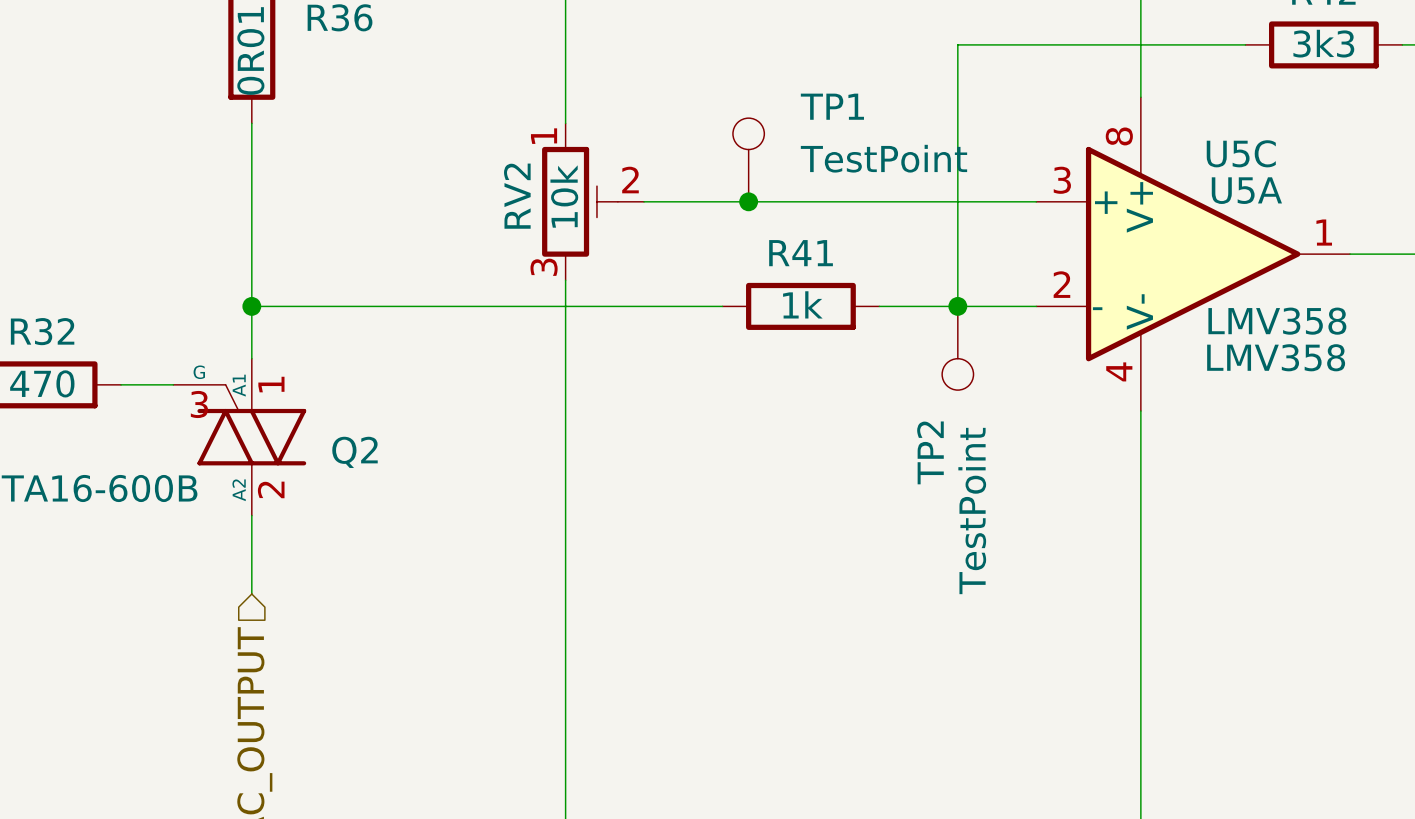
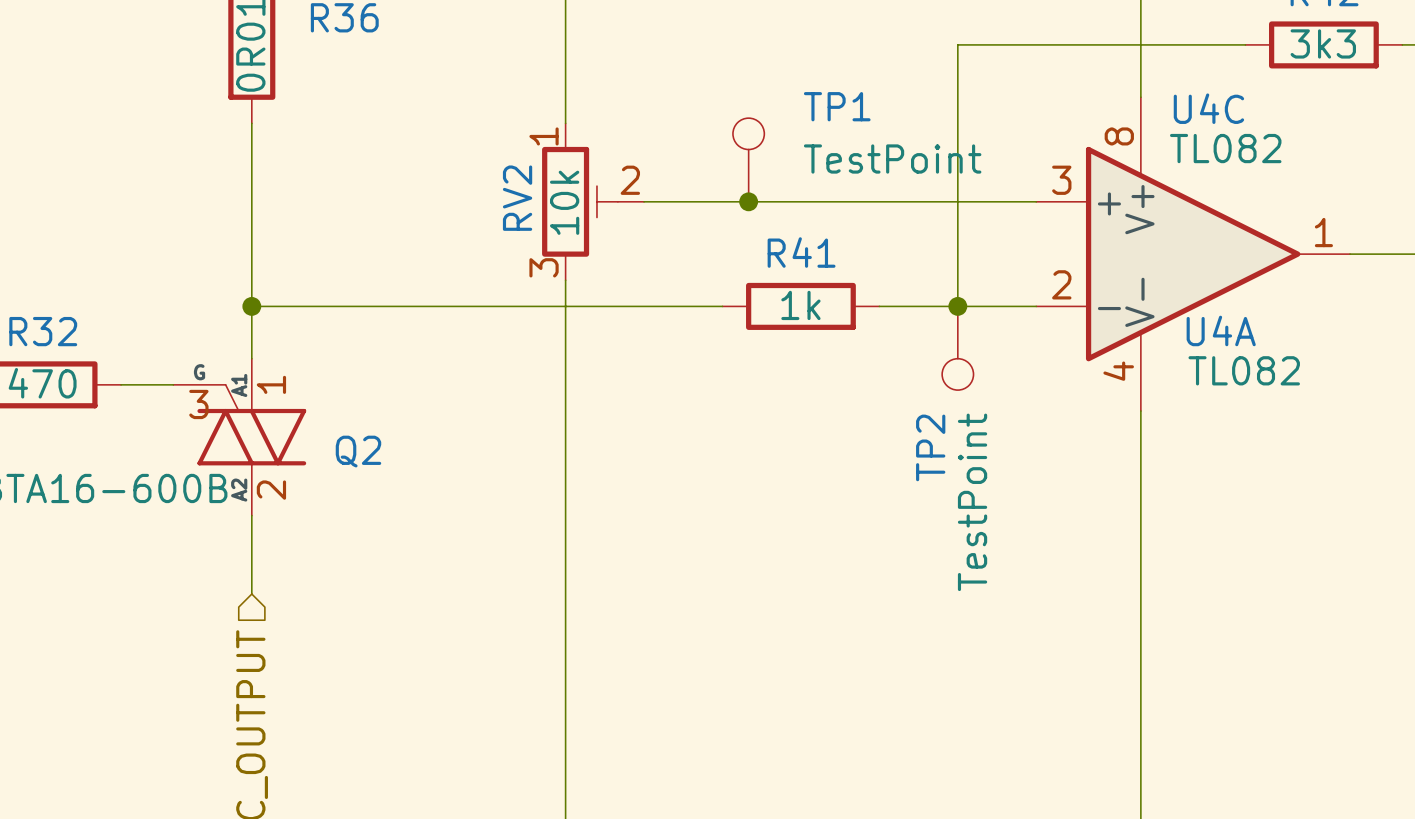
U5C name: U5C (1241, 153) -> U4C (1208, 108)
U5A name: U5A (1246, 190) -> U4A (1221, 330)
U5A value: LMV358 (1277, 321) -> TL082 (1244, 370)
U5C value: LMV358 (1276, 357) -> TL082 (1225, 148)

